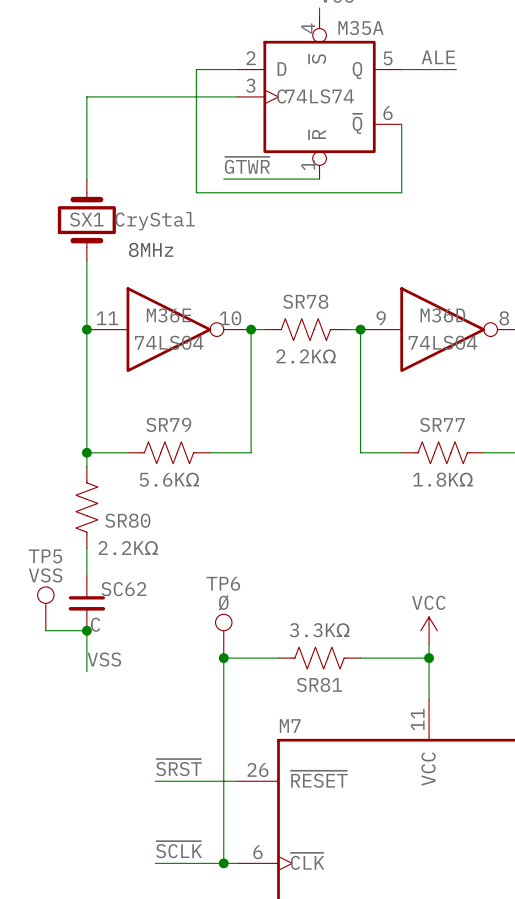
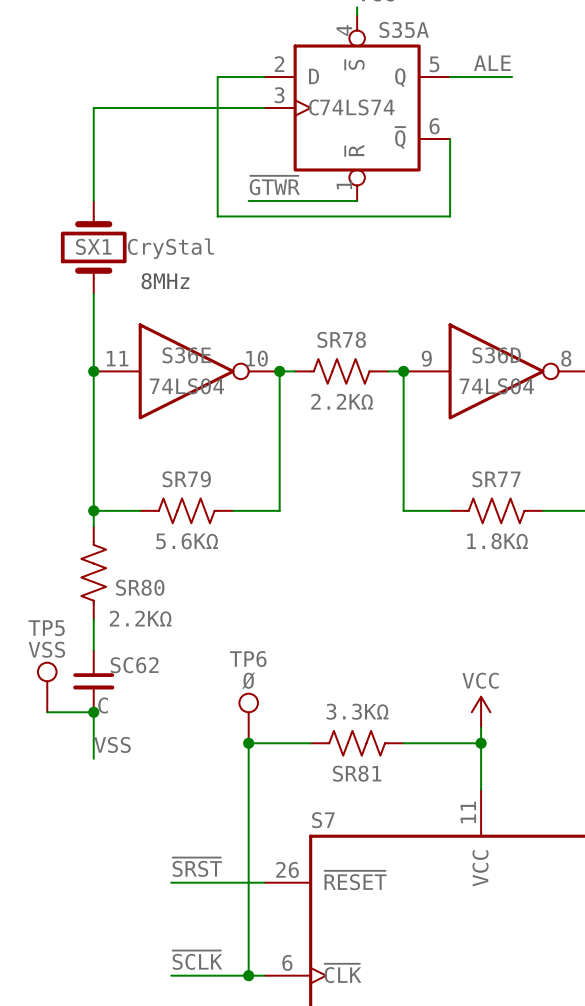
M35A name: M35A (360, 28) -> S35A (404, 29)
M36E name: M36E (168, 315) -> S36E (186, 355)
M36D name: M36D (442, 315) -> S36D (496, 355)
M7 name: M7 (290, 726) -> S7 (323, 820)

